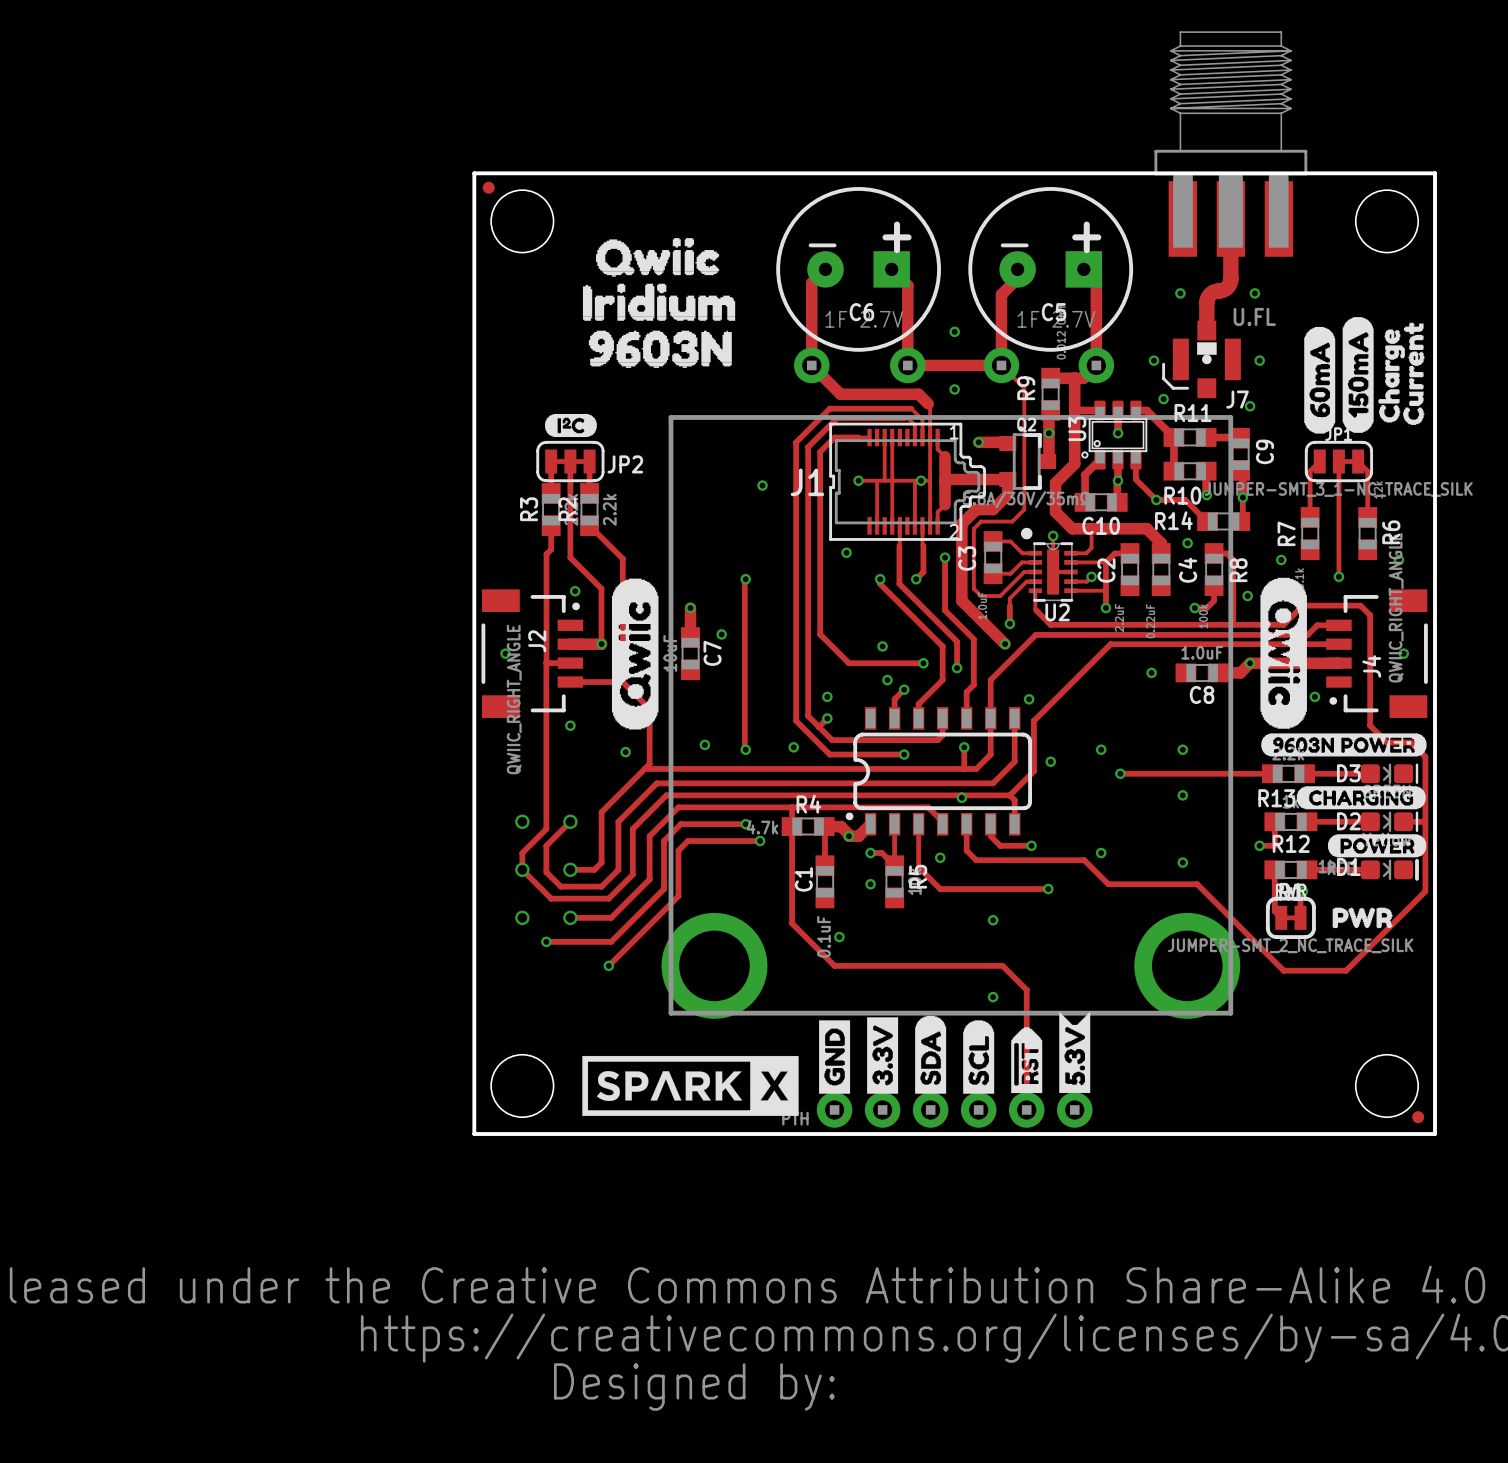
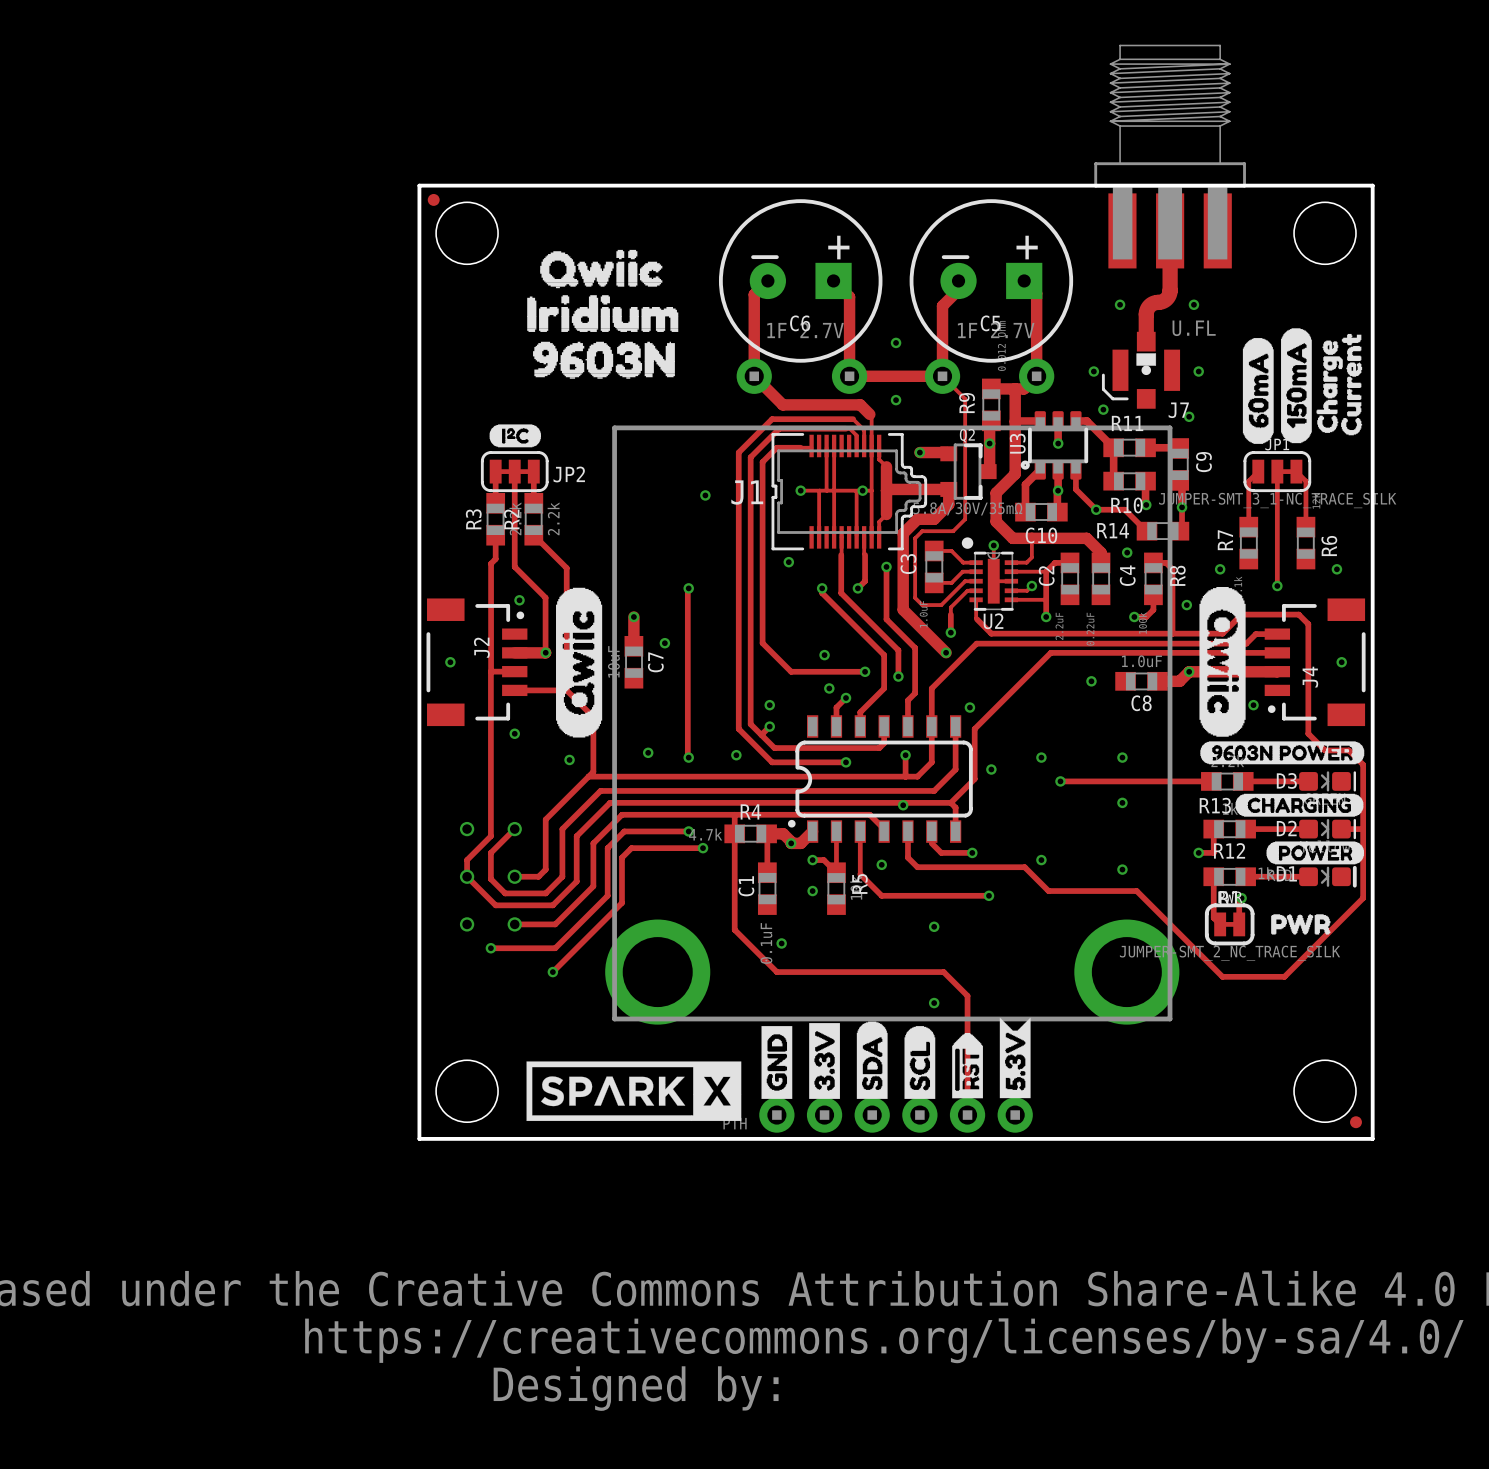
U3 footprint: [1081, 400, 1148, 470] -> [1020, 411, 1089, 480]
J1 footprint: [661, 415, 1241, 1019] -> [605, 425, 1180, 1025]
J4 value: QWIIC_RIGHT_ANGLE (1396, 607) -> none
J2 value: QWIIC_RIGHT_ANGLE (514, 699) -> none

